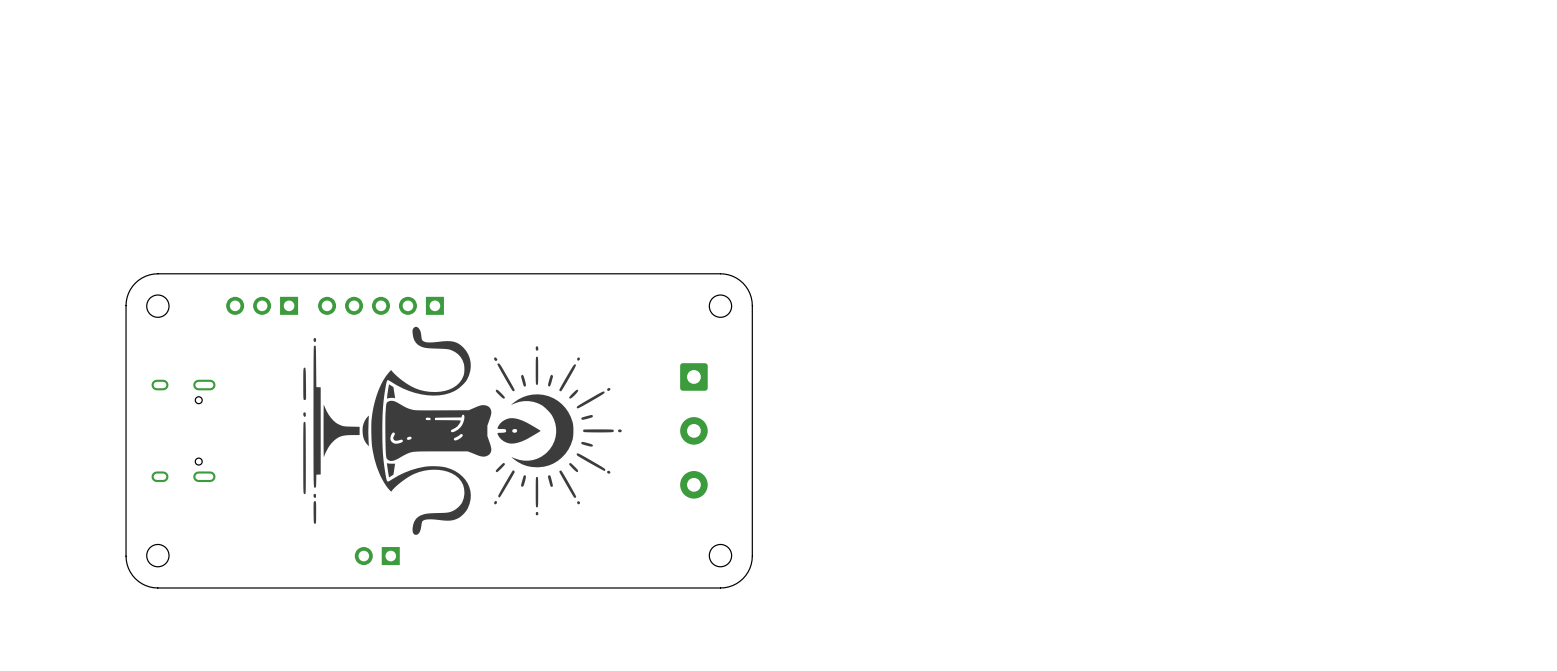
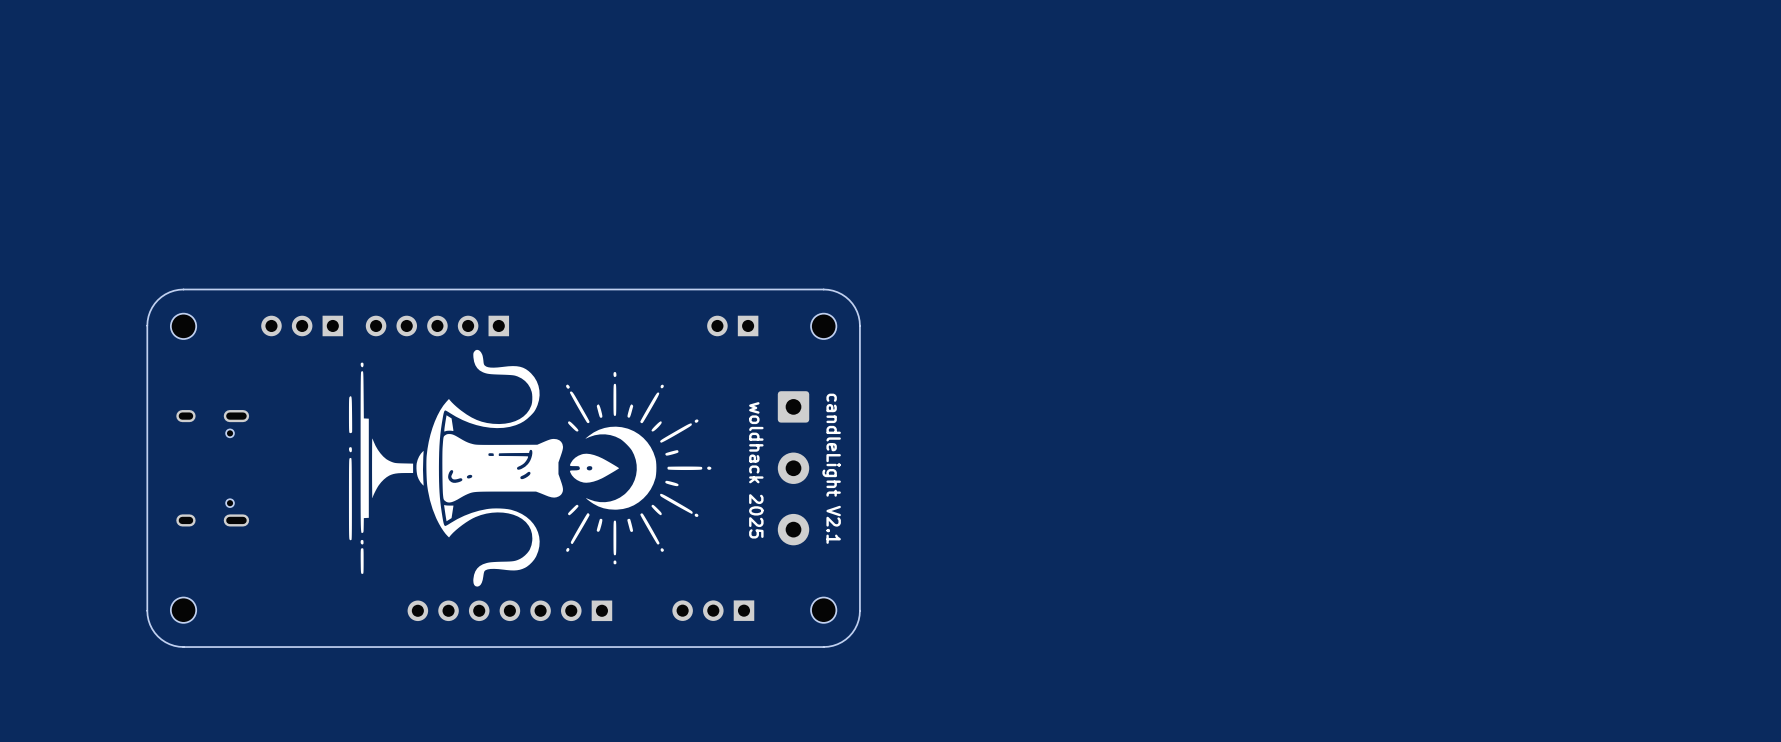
part: none -> (732, 325)
text: none -> candleLight V2.1 (831, 468)
text: none -> woldhack 2025 (756, 470)
part: (377, 556) -> none
part: none -> (509, 610)
part: none -> (713, 610)

